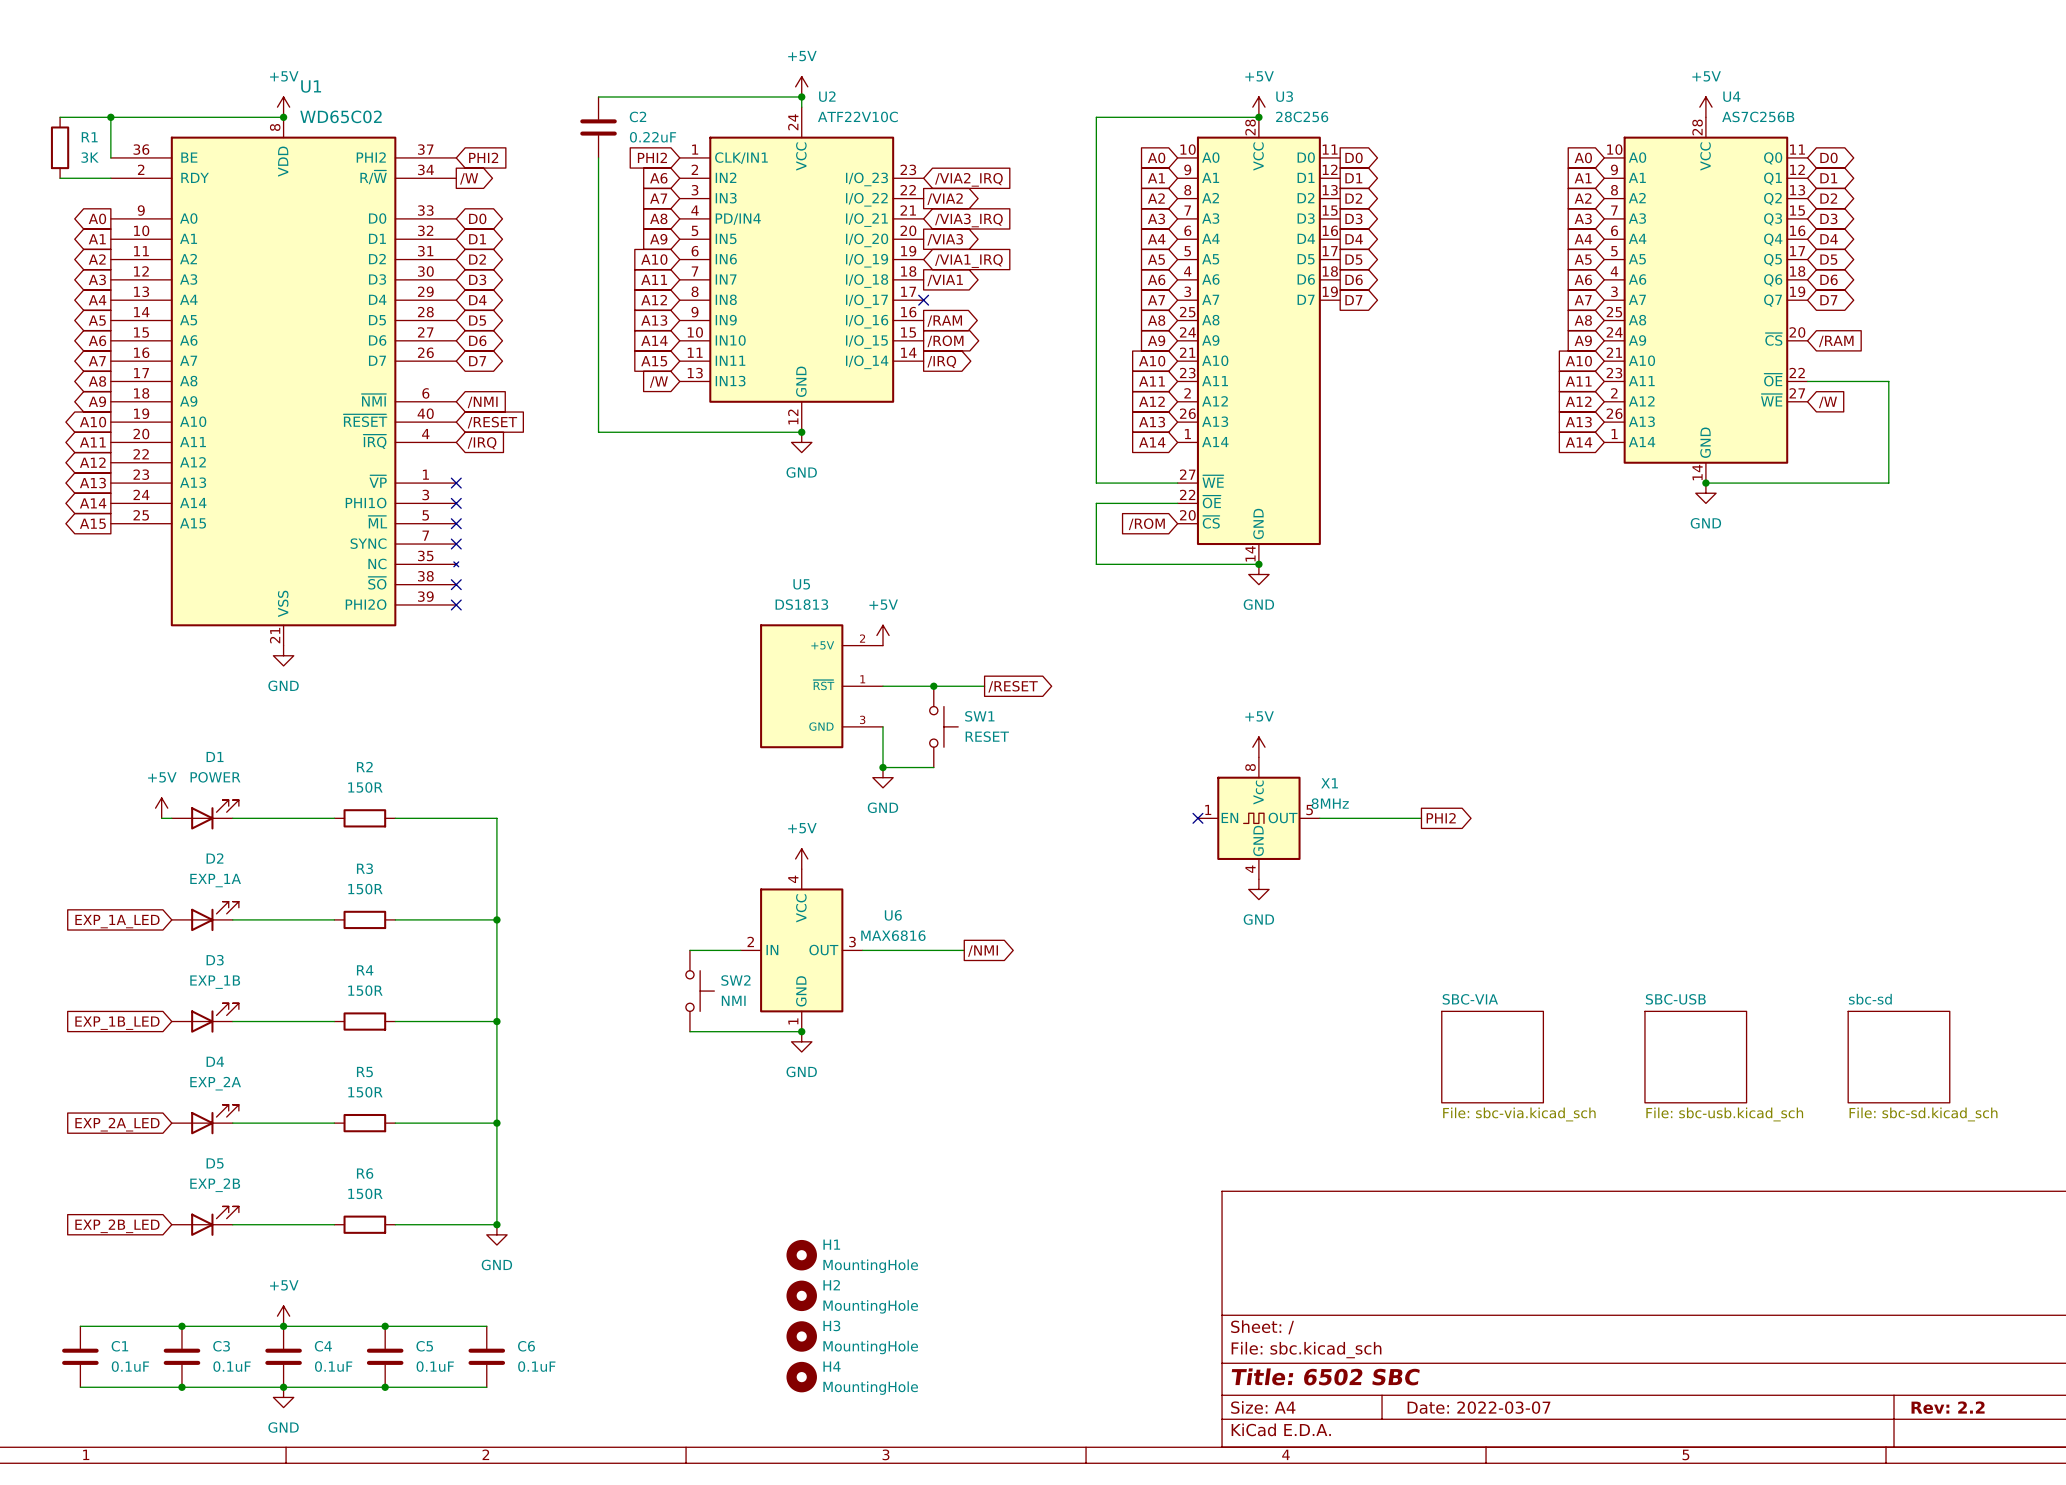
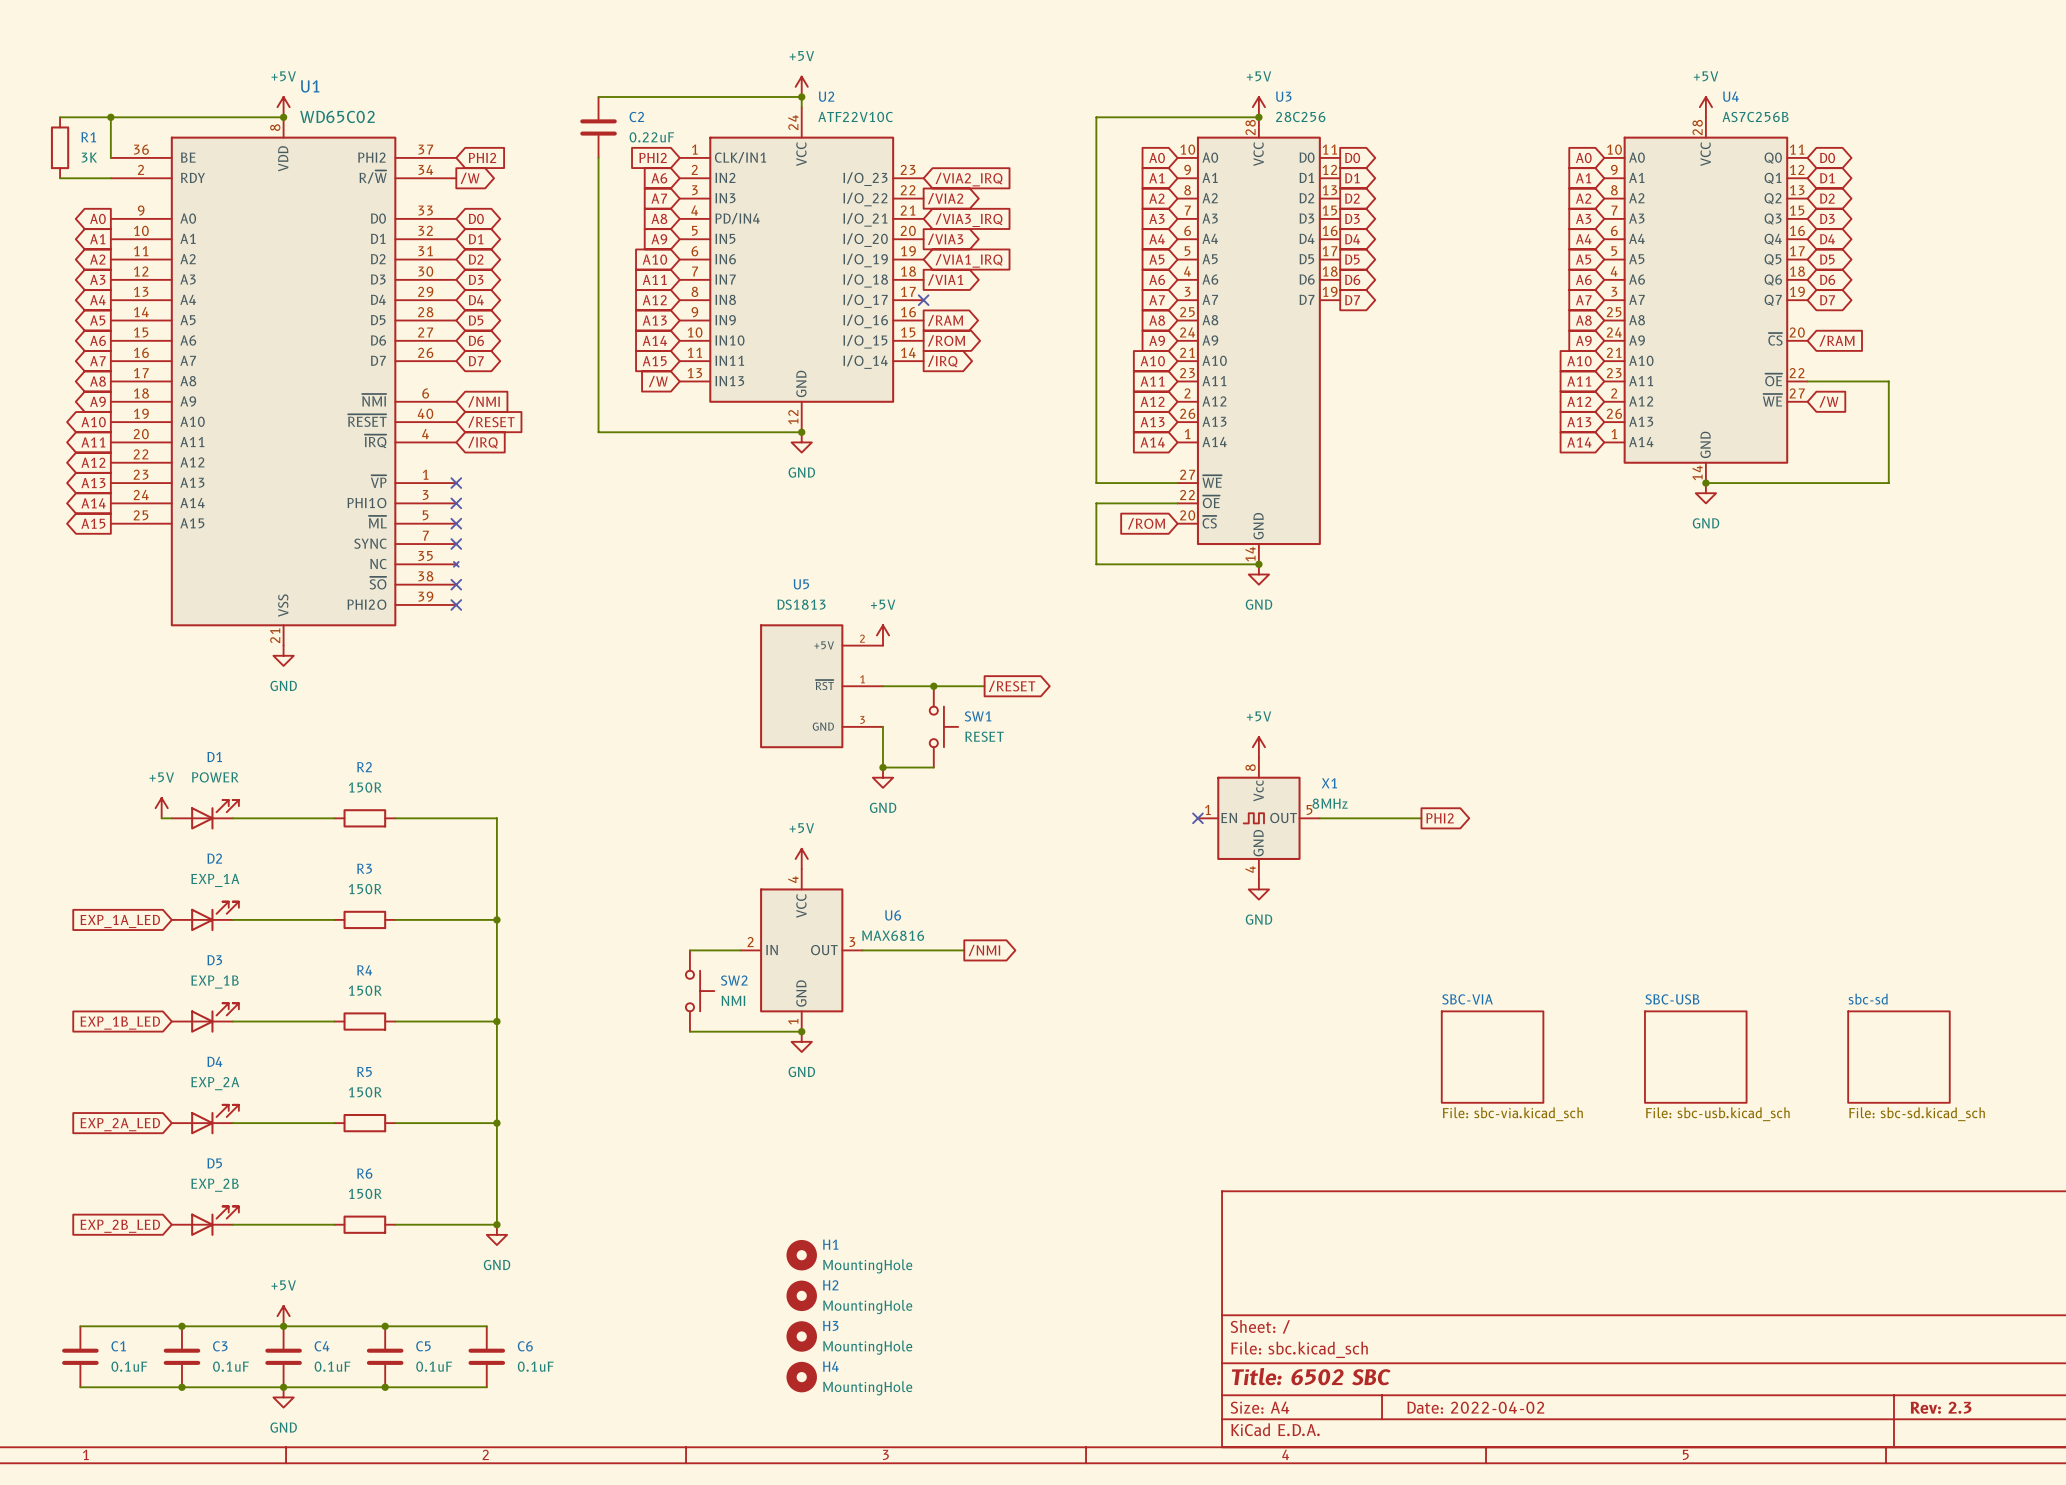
title block: Date: 2022-03-07 (1479, 1407) -> Date: 2022-04-02 (1475, 1407)
title block: Rev: 2.2 (1948, 1407) -> Rev: 2.3 (1941, 1407)

